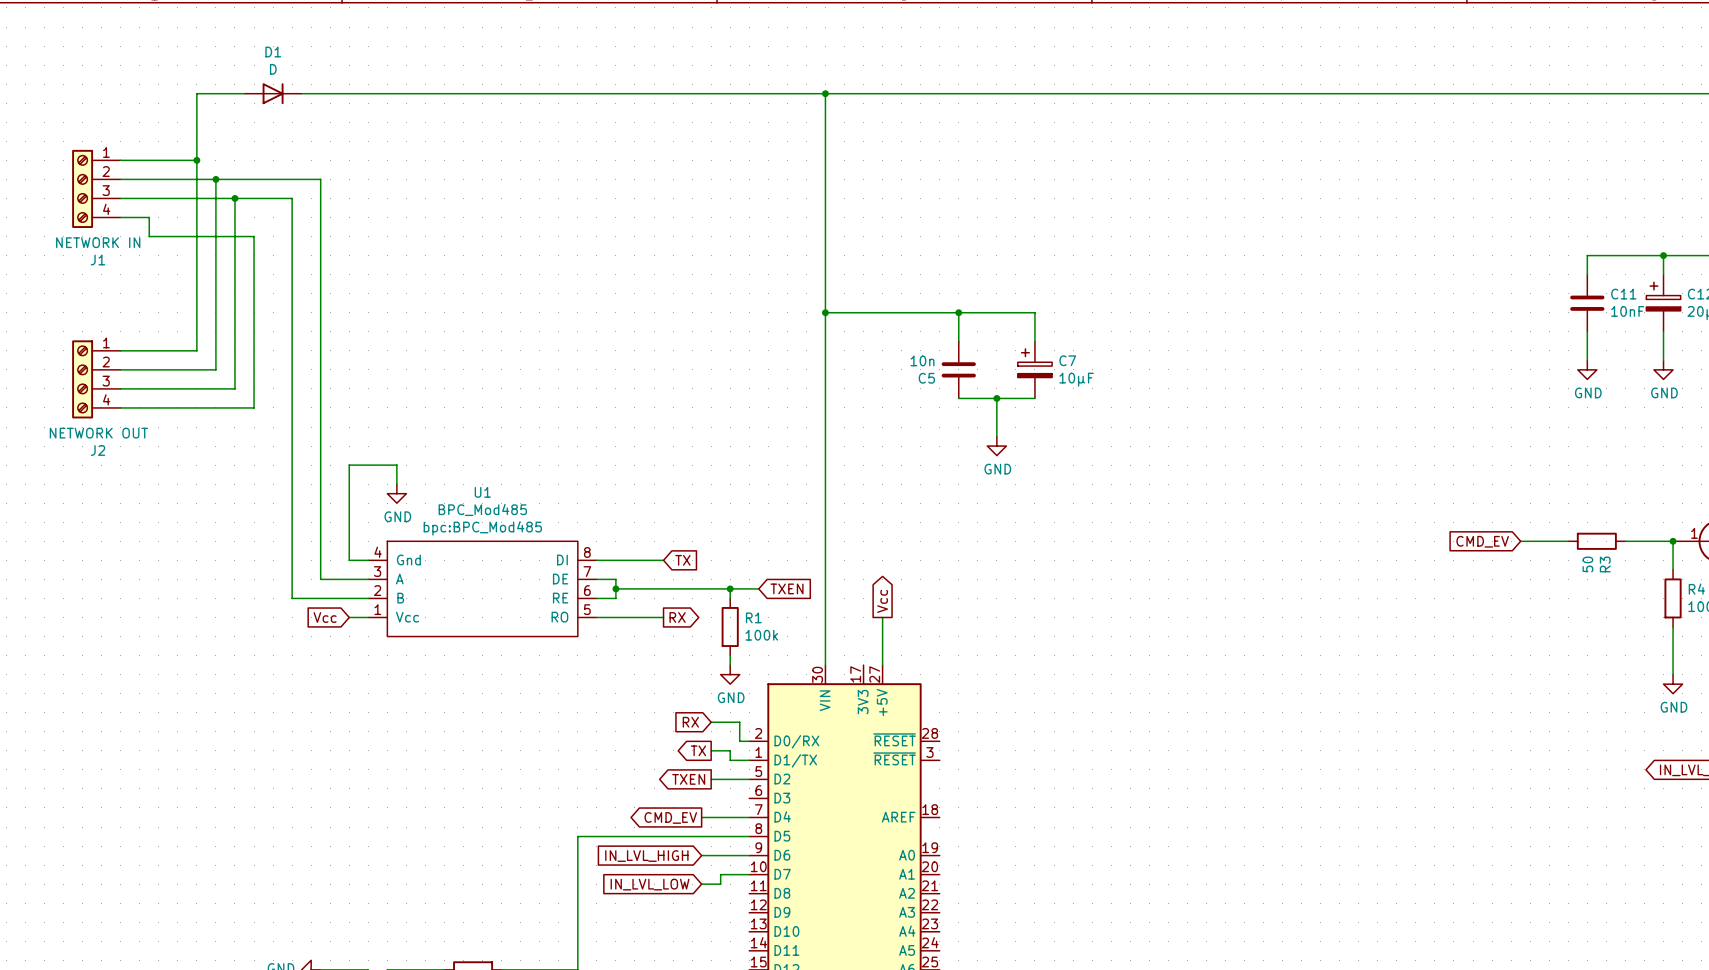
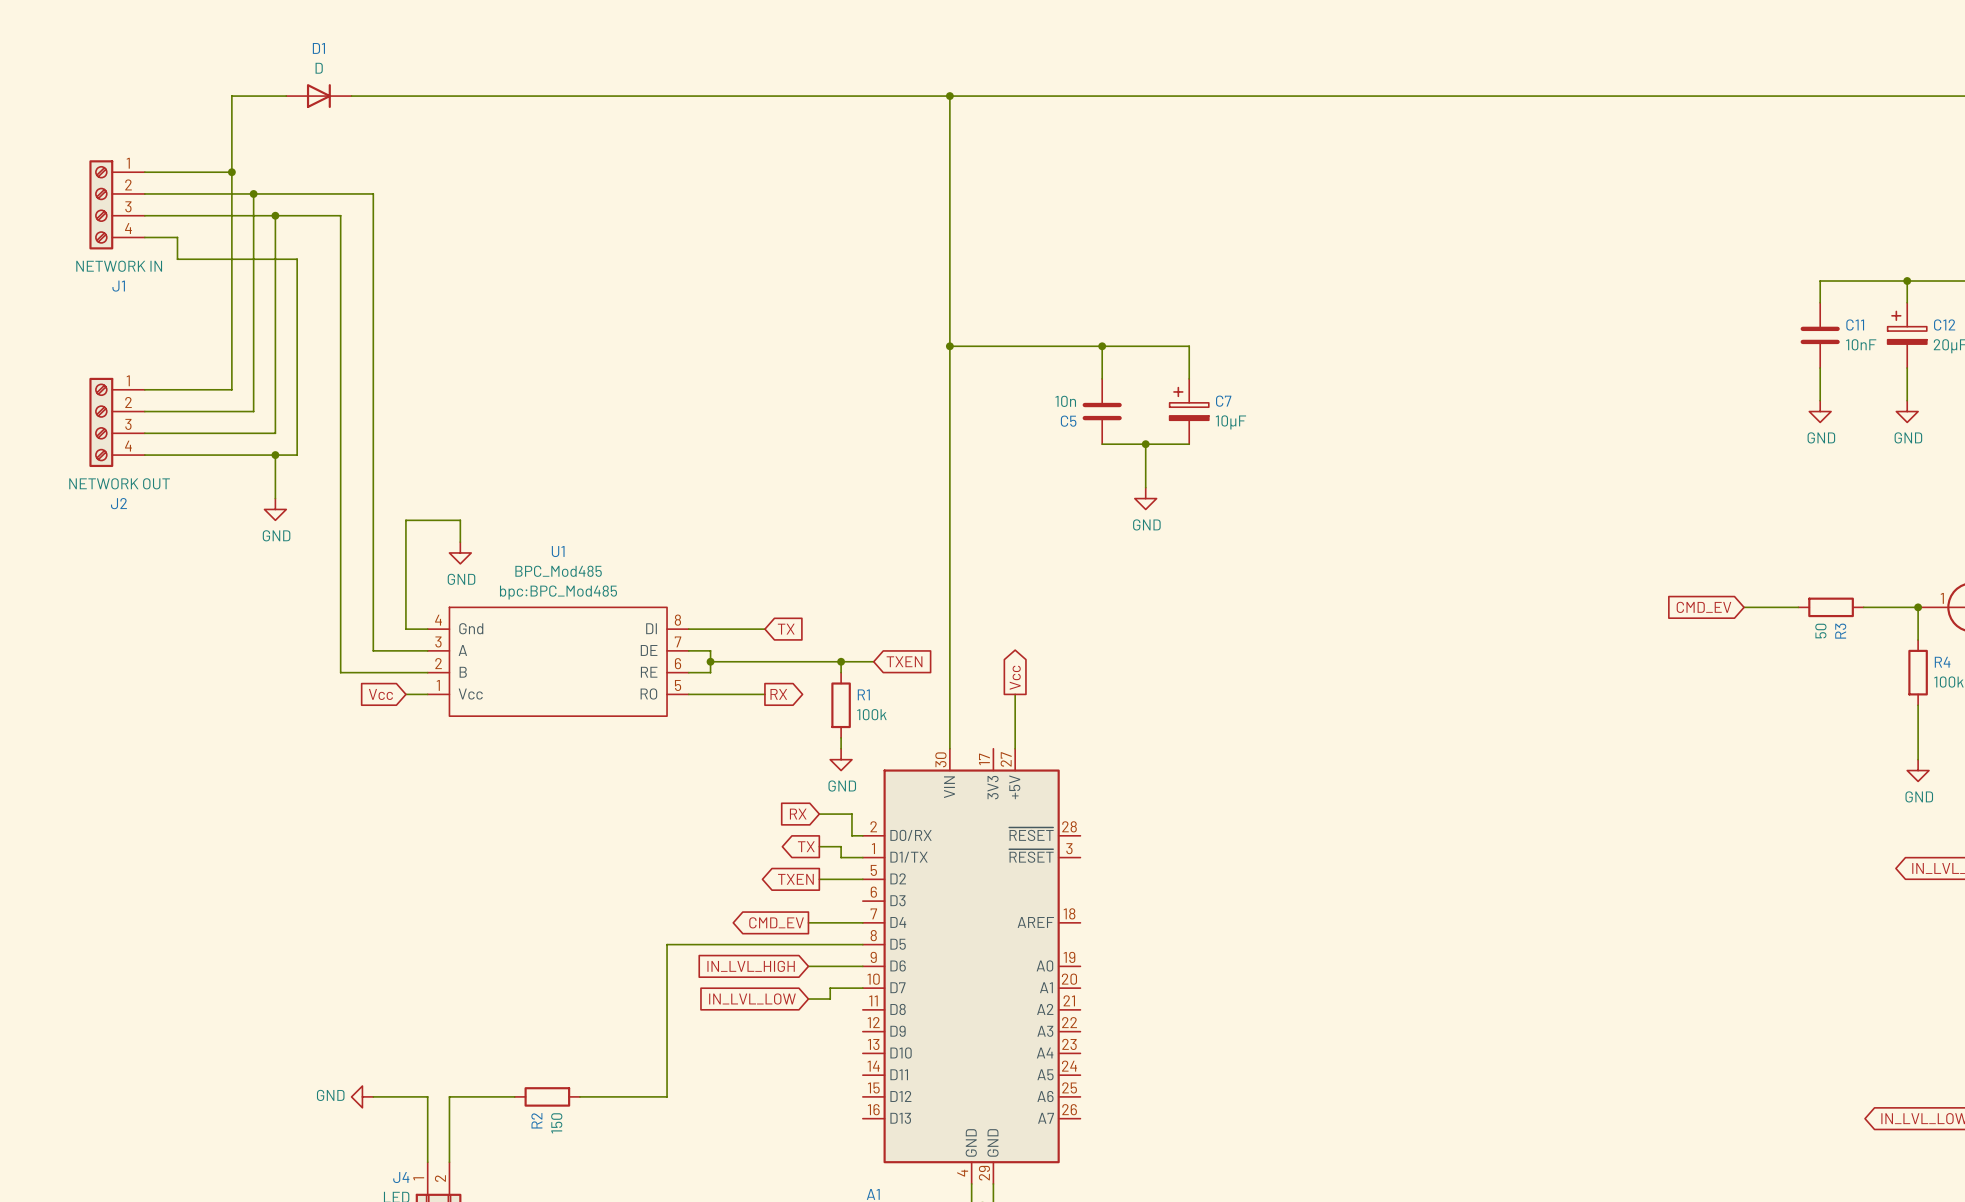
wire: none -> (275, 455) (275, 498)
junction: none -> (275, 455)
power symbol: none -> GND (275, 509)

